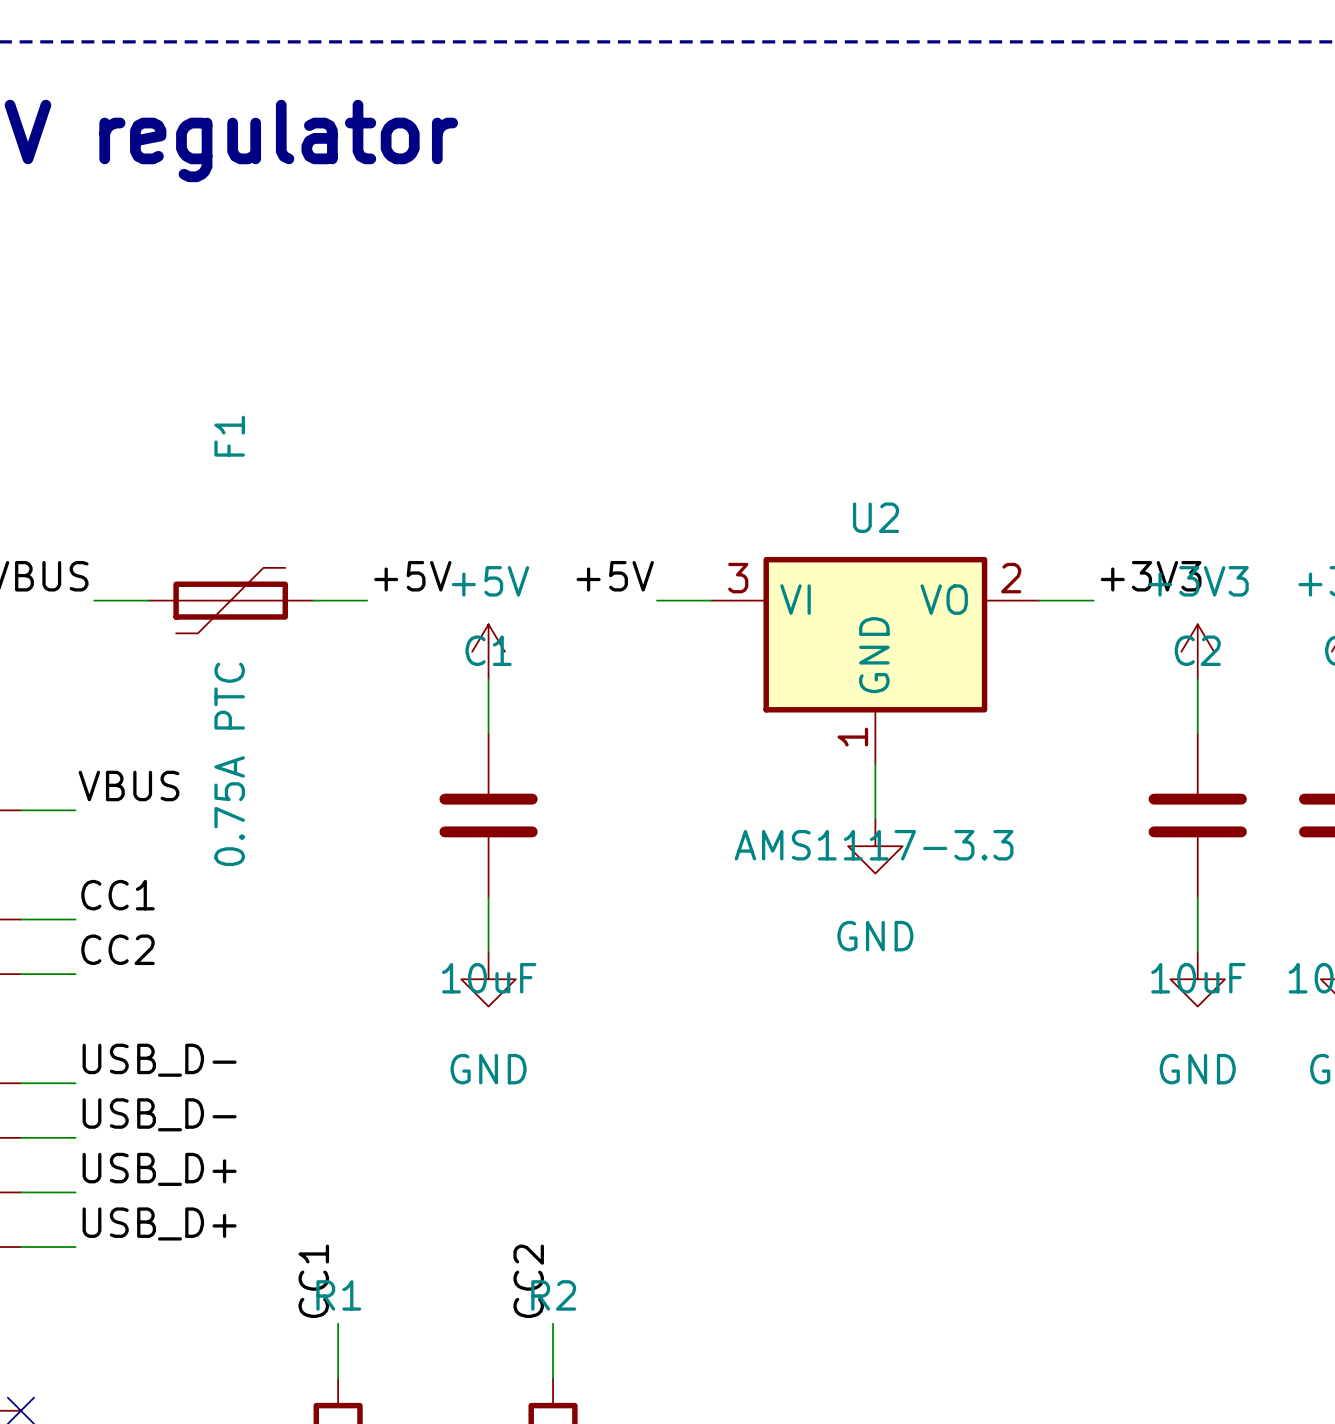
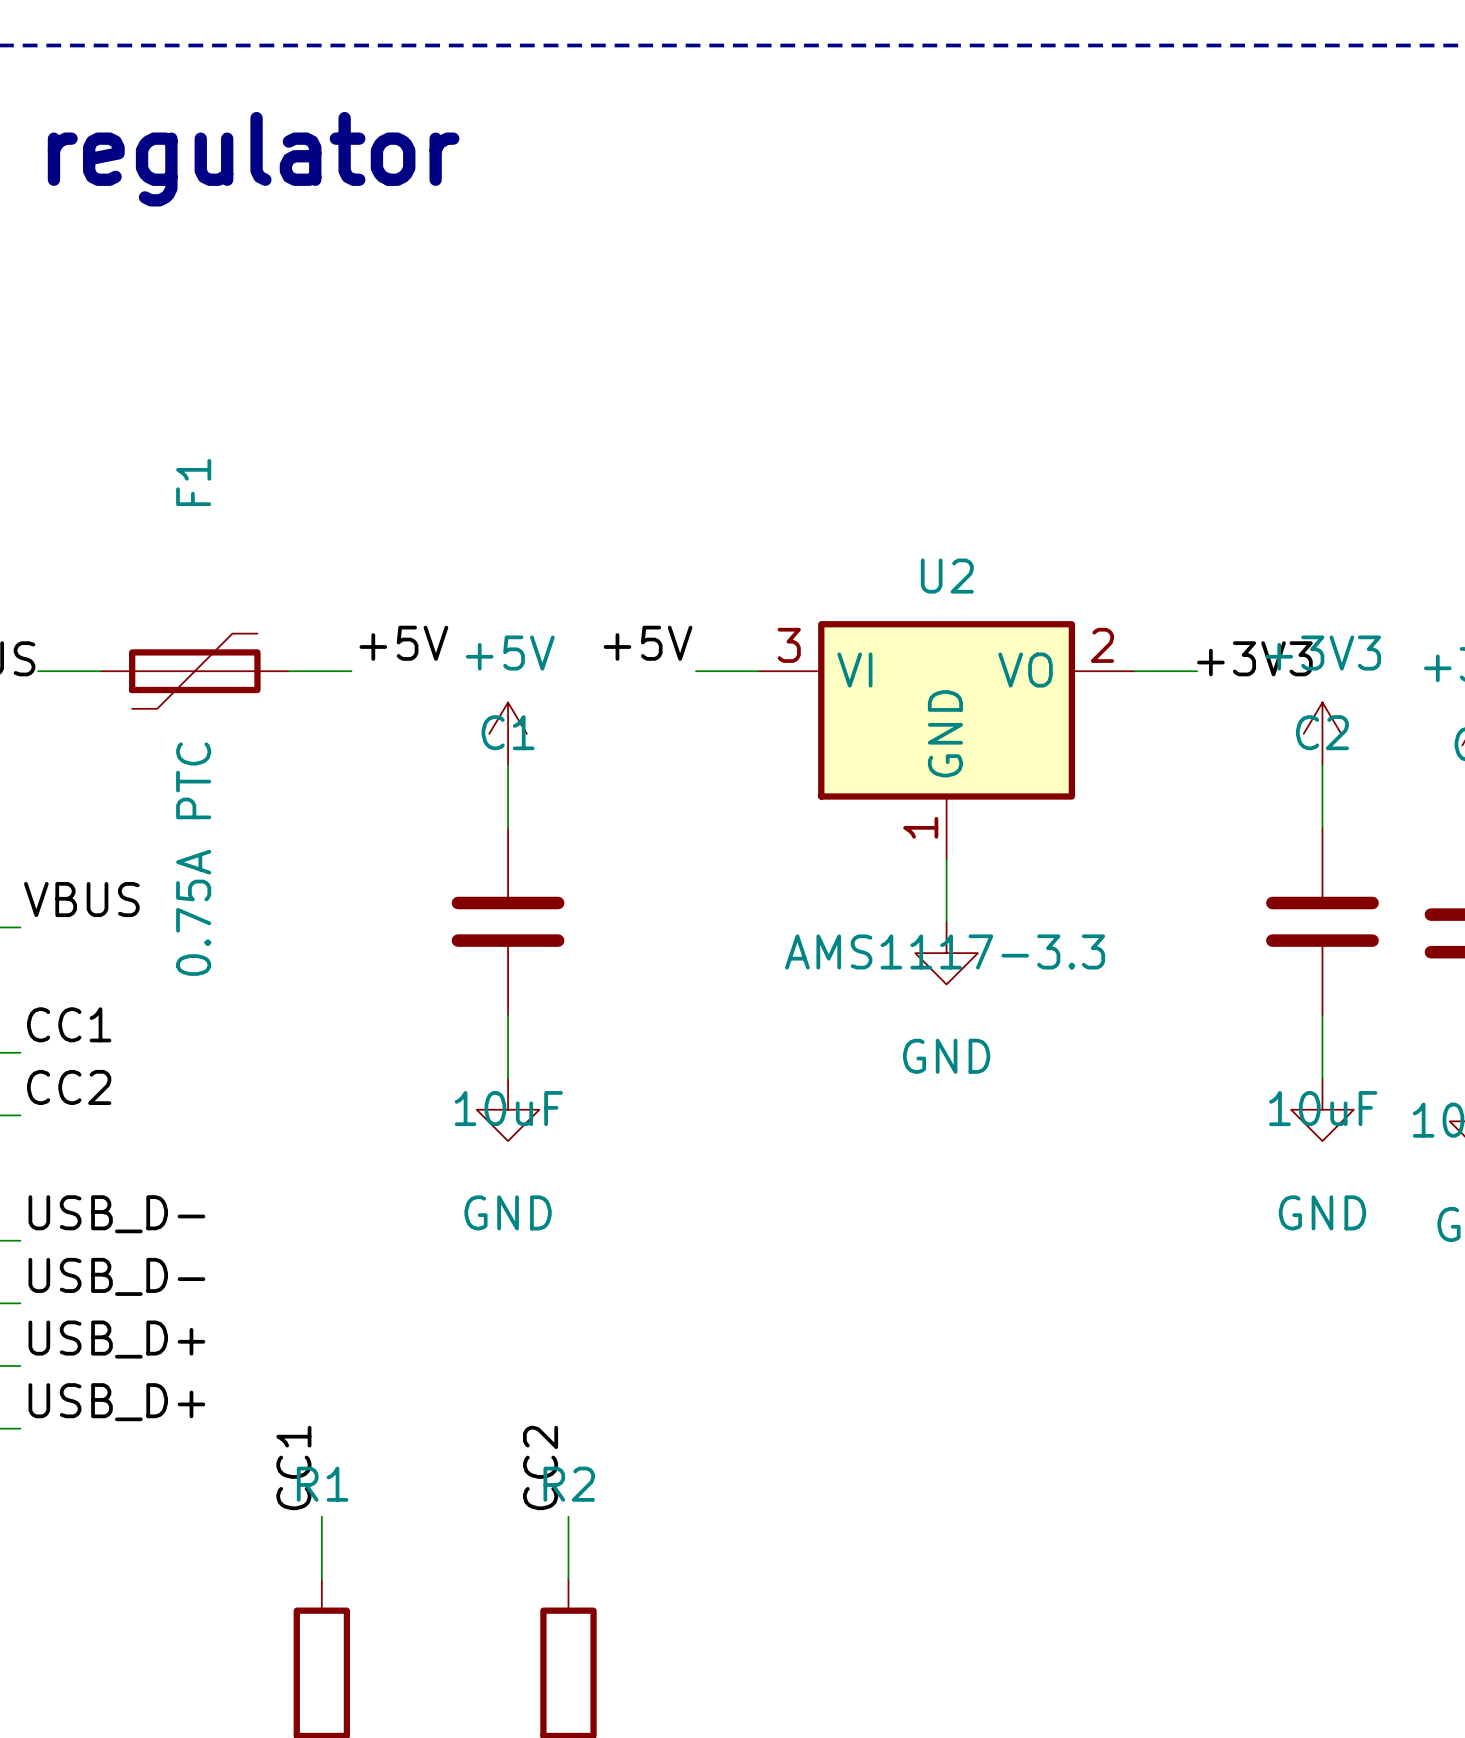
label position: +5V (412, 576) -> +5V (403, 643)
label position: +5V (615, 576) -> +5V (648, 643)
wire: (94, 600) (148, 600) -> (38, 671) (100, 671)
F1 position: (230, 600) -> (194, 671)
wire: (312, 600) (367, 600) -> (288, 671) (351, 671)
wire: (657, 600) (711, 600) -> (696, 671) (758, 671)
wire: (1039, 600) (1093, 600) -> (1134, 671) (1197, 671)
power symbol position: +5V (488, 651) -> +5V (508, 733)
power symbol position: +3V3 (1197, 651) -> +3V3 (1322, 733)
U2 position: (875, 660) -> (946, 740)
wire: (488, 679) (488, 733) -> (508, 765) (508, 827)
wire: (1197, 679) (1197, 733) -> (1322, 765) (1322, 827)
wire: (875, 764) (875, 818) -> (946, 859) (946, 921)
C1 position: (488, 815) -> (508, 921)
C2 position: (1197, 815) -> (1322, 921)
power symbol position: GND (875, 846) -> GND (946, 953)
wire: (488, 897) (488, 951) -> (508, 1015) (508, 1078)
wire: (1197, 897) (1197, 951) -> (1322, 1015) (1322, 1078)
power symbol position: GND (488, 979) -> GND (508, 1109)
power symbol position: GND (1197, 979) -> GND (1322, 1109)

